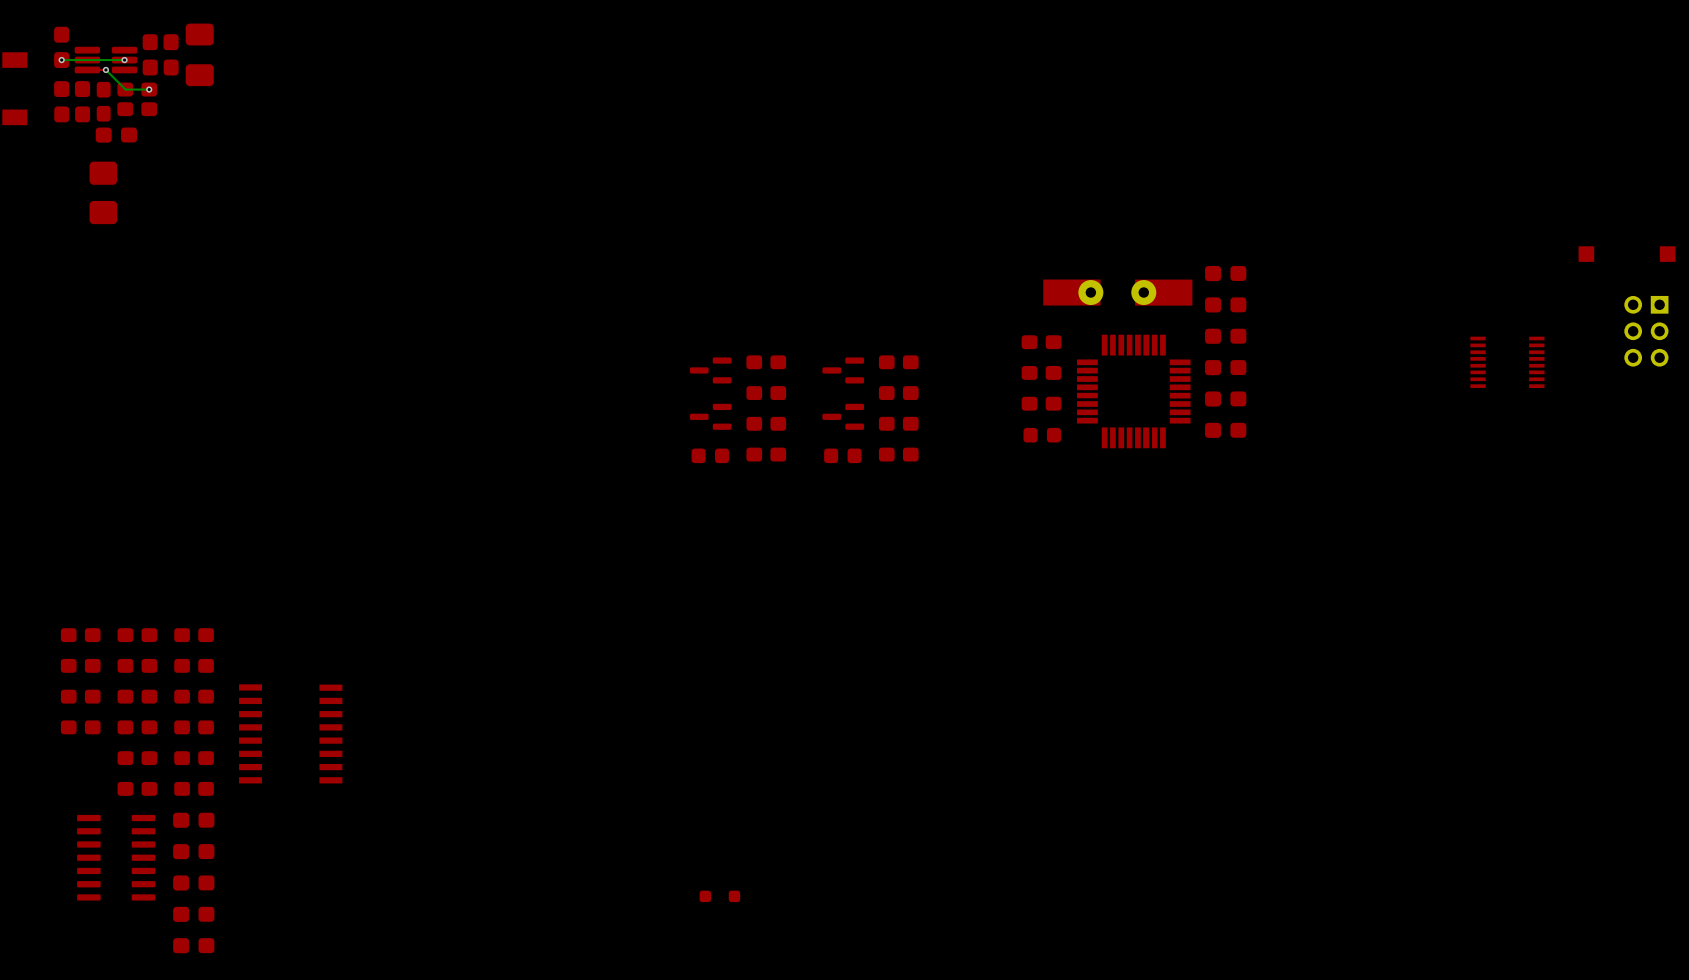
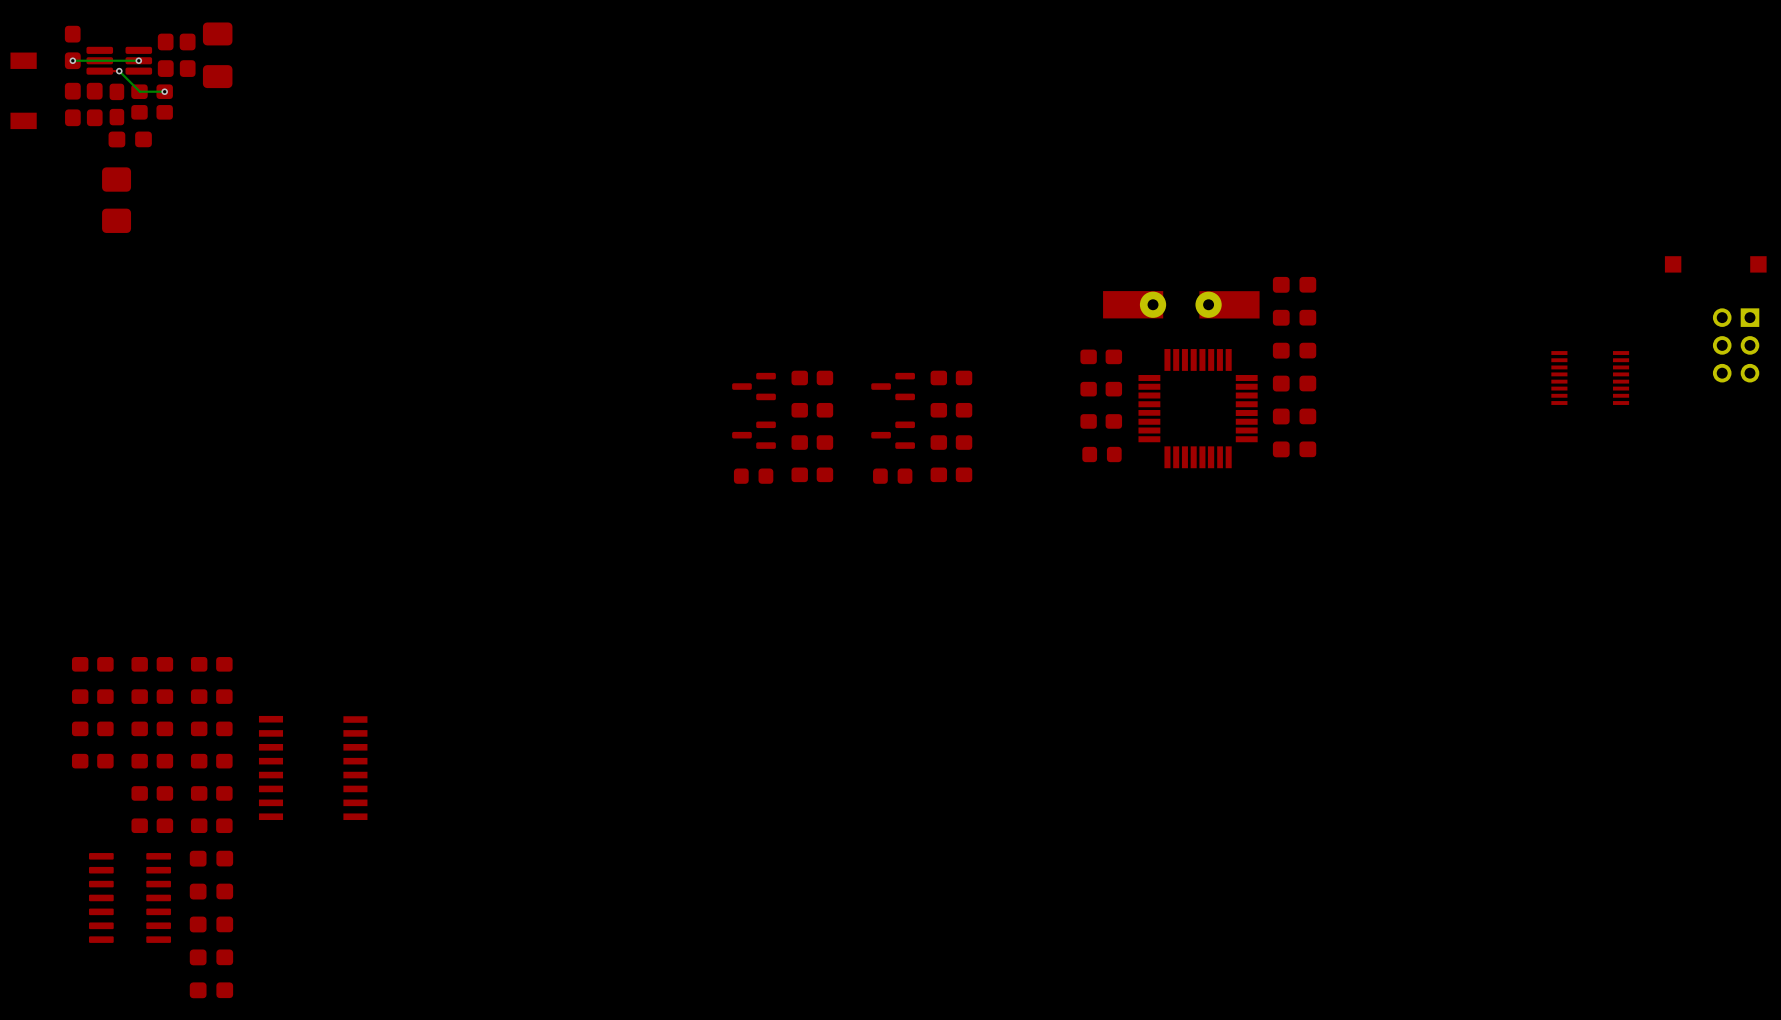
part: (719, 896) -> none

